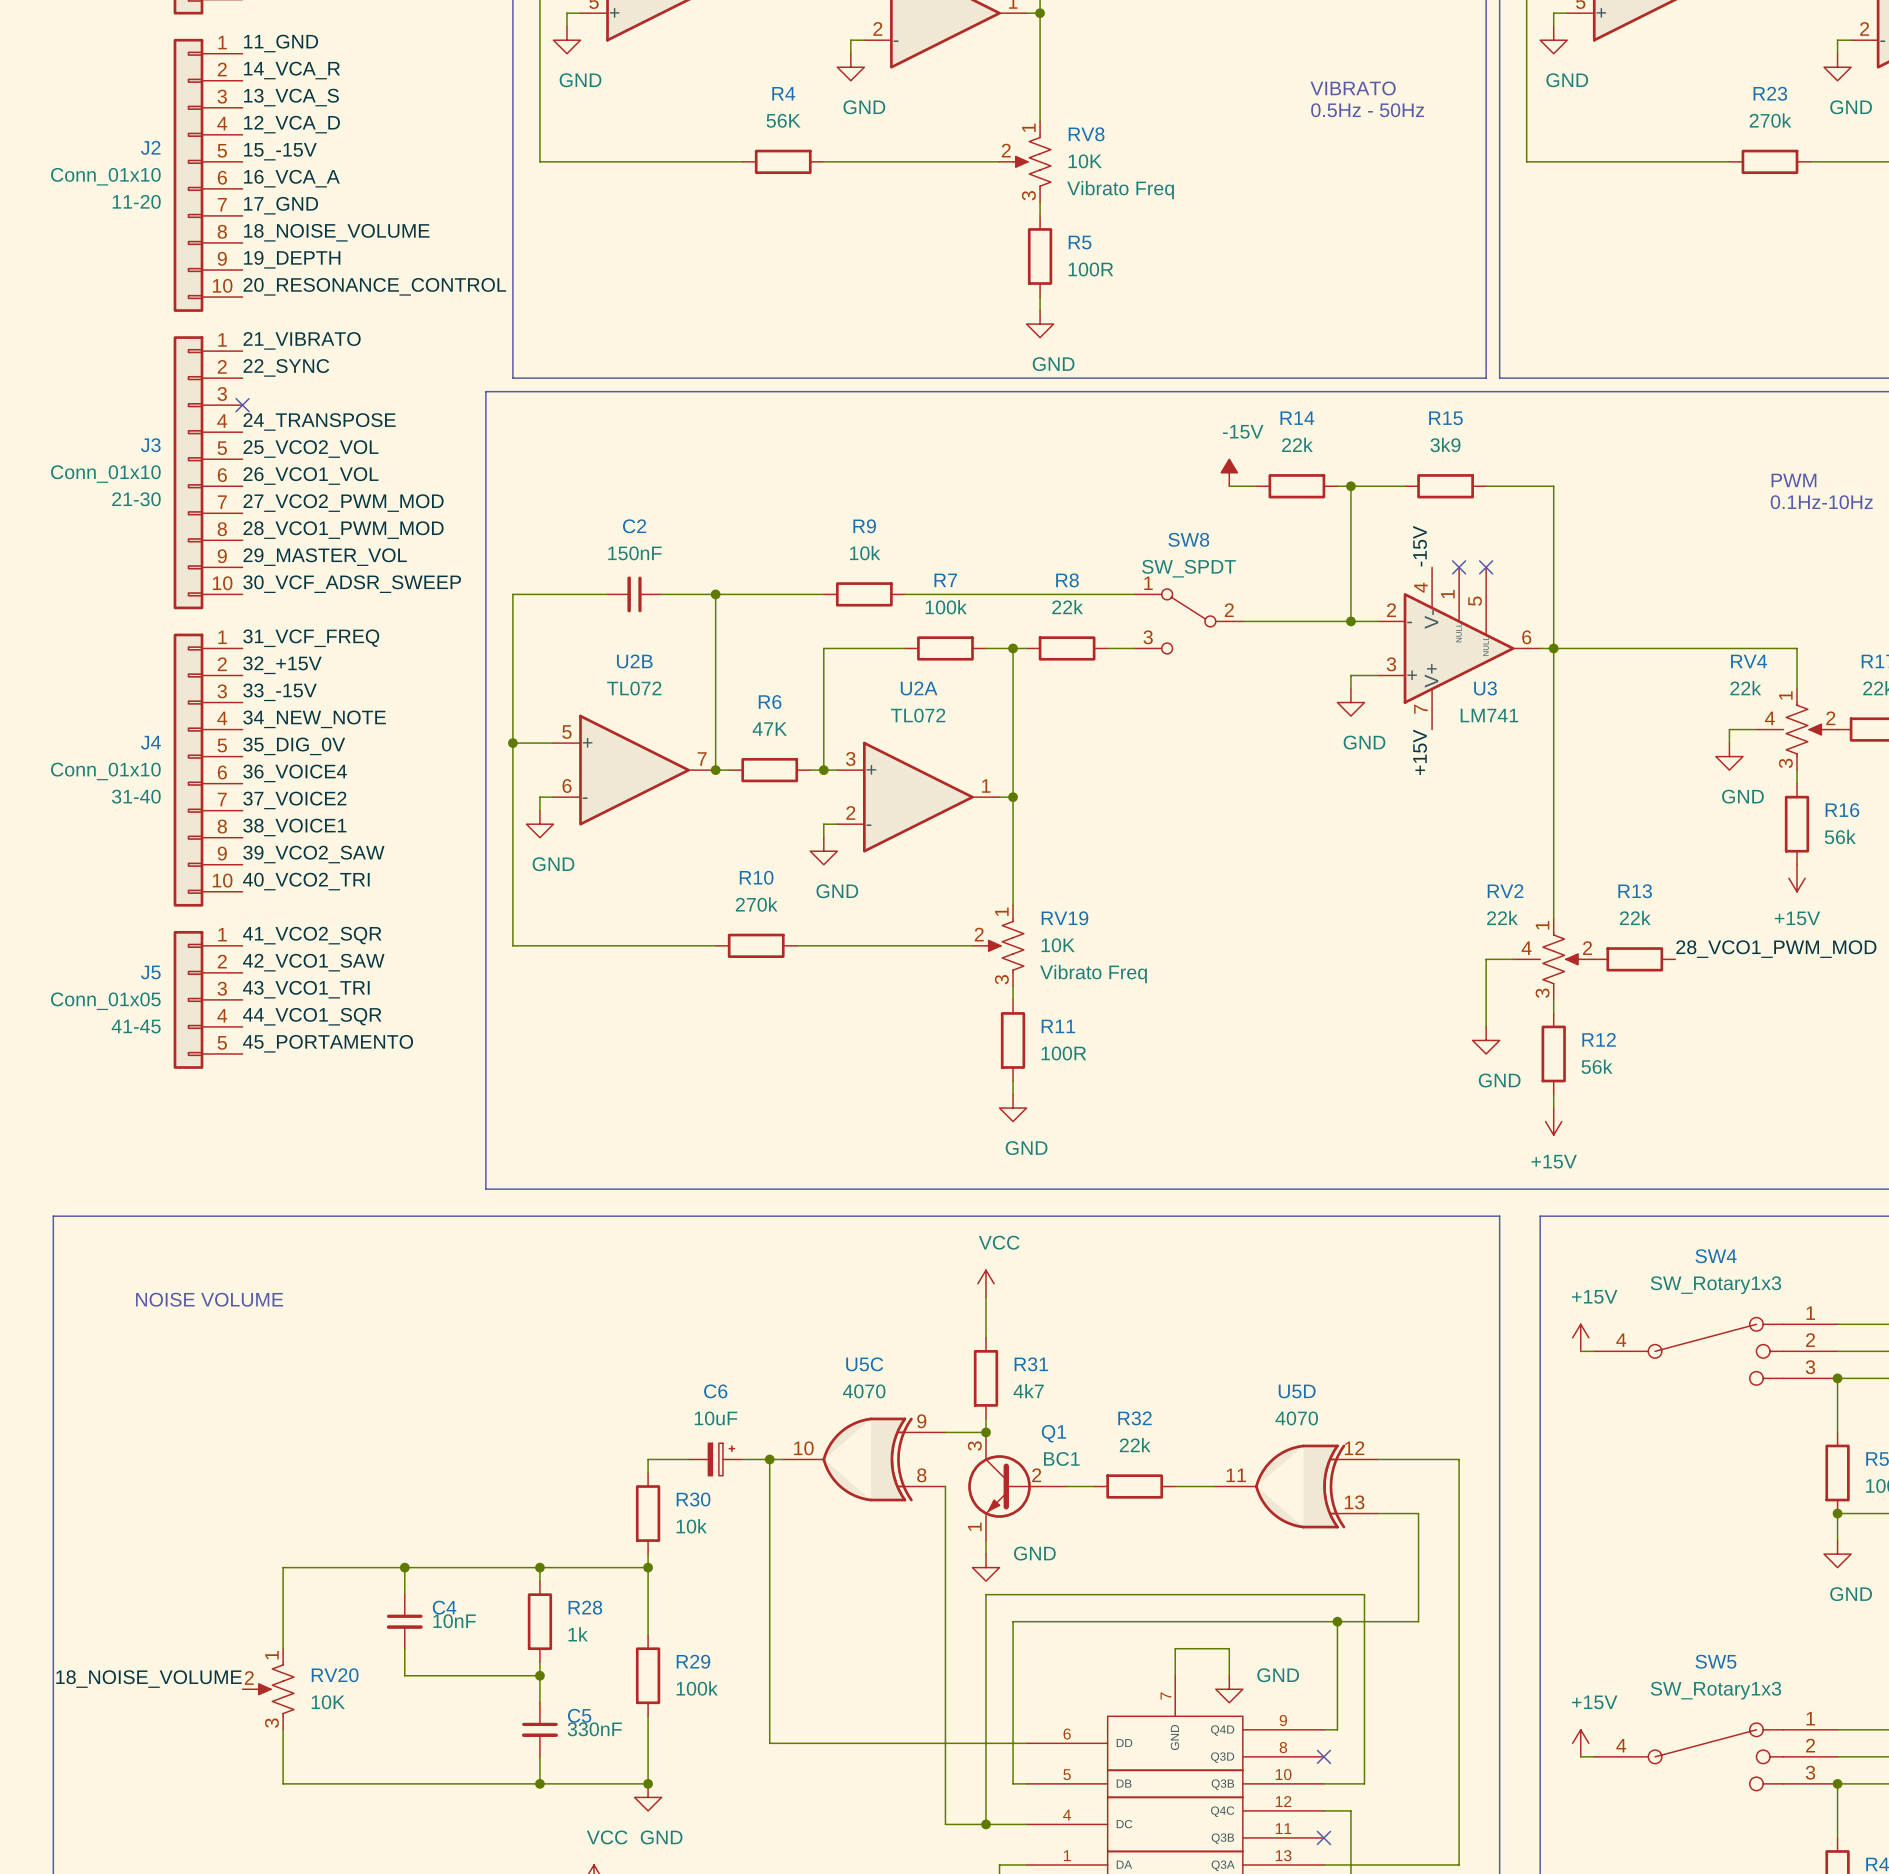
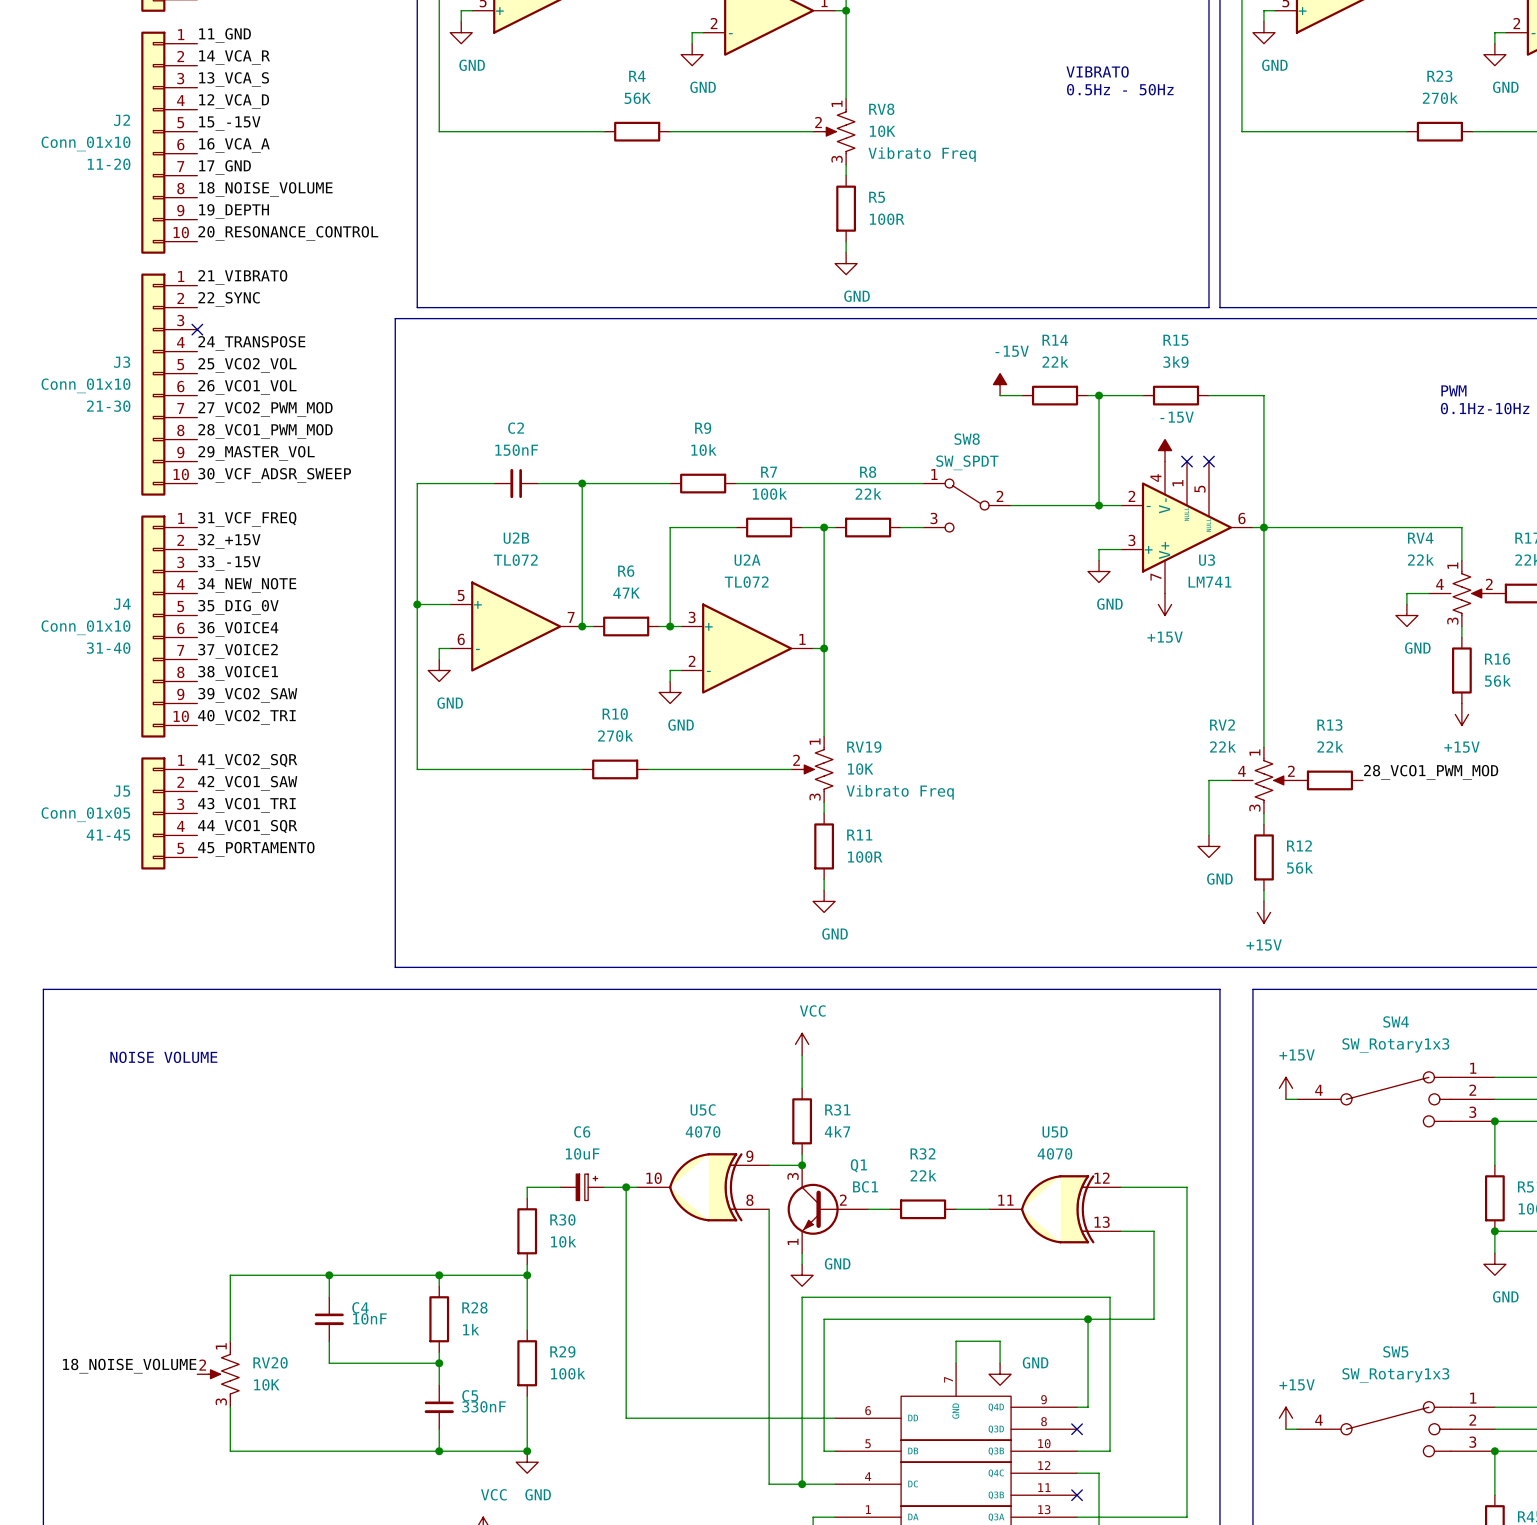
label: -15V (1420, 546) -> none
power symbol: none -> -15V (1165, 450)
power symbol: none -> +15V (1165, 604)
label: +15V (1420, 752) -> none

